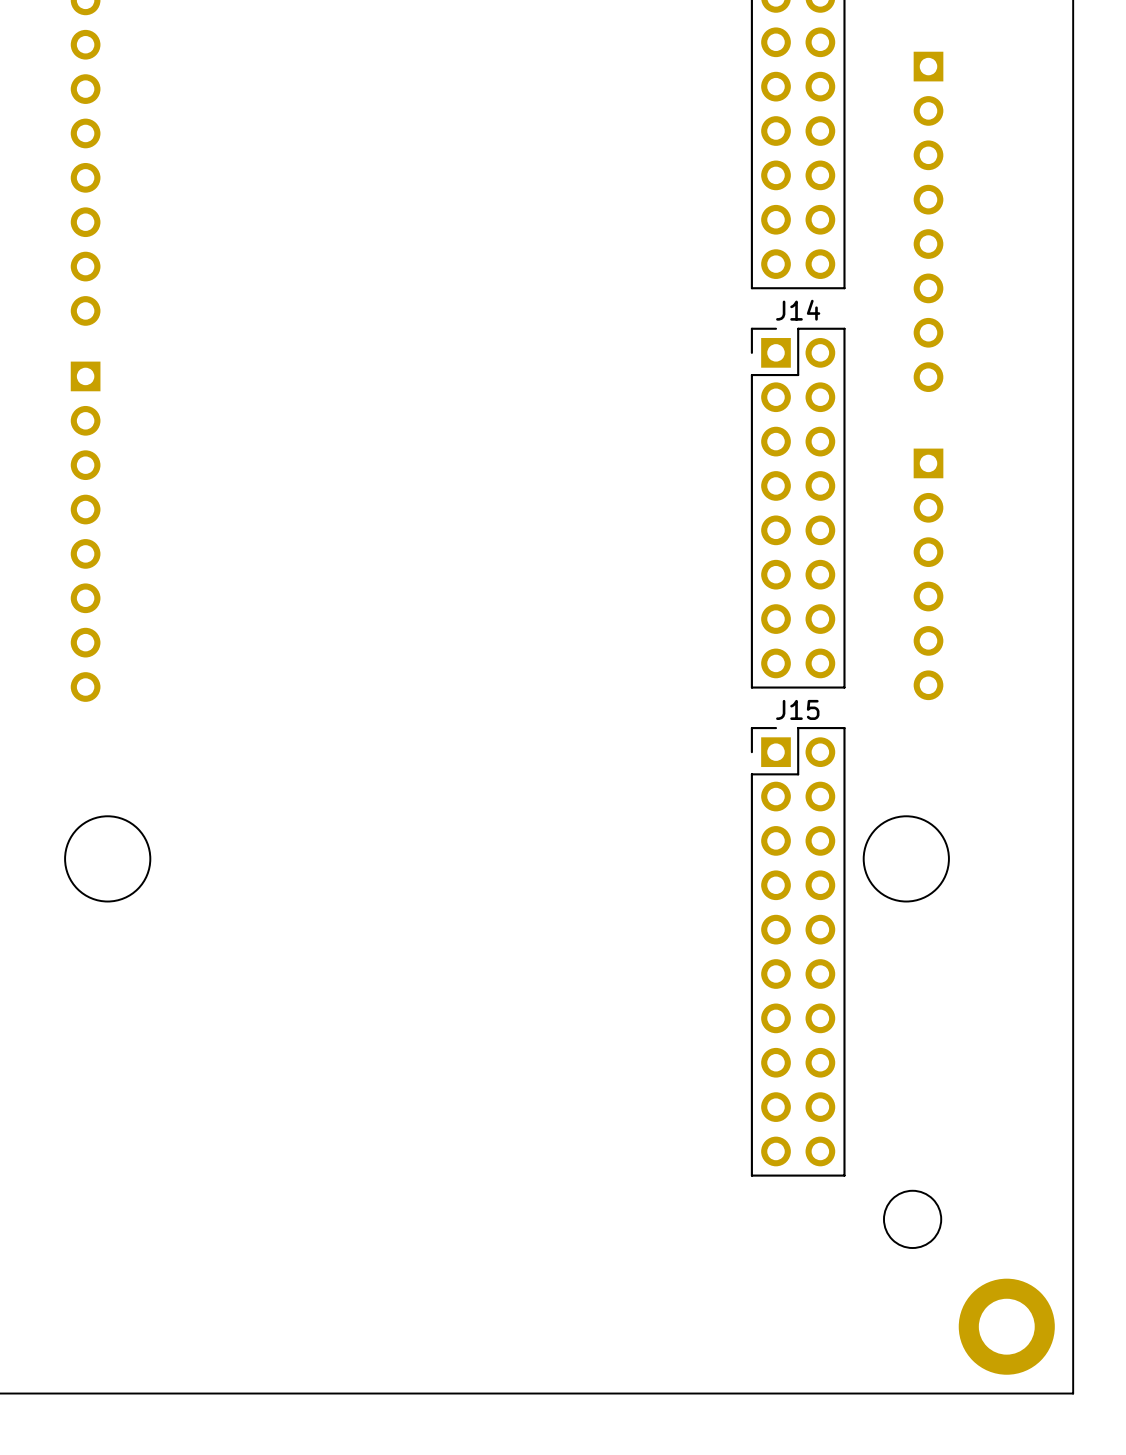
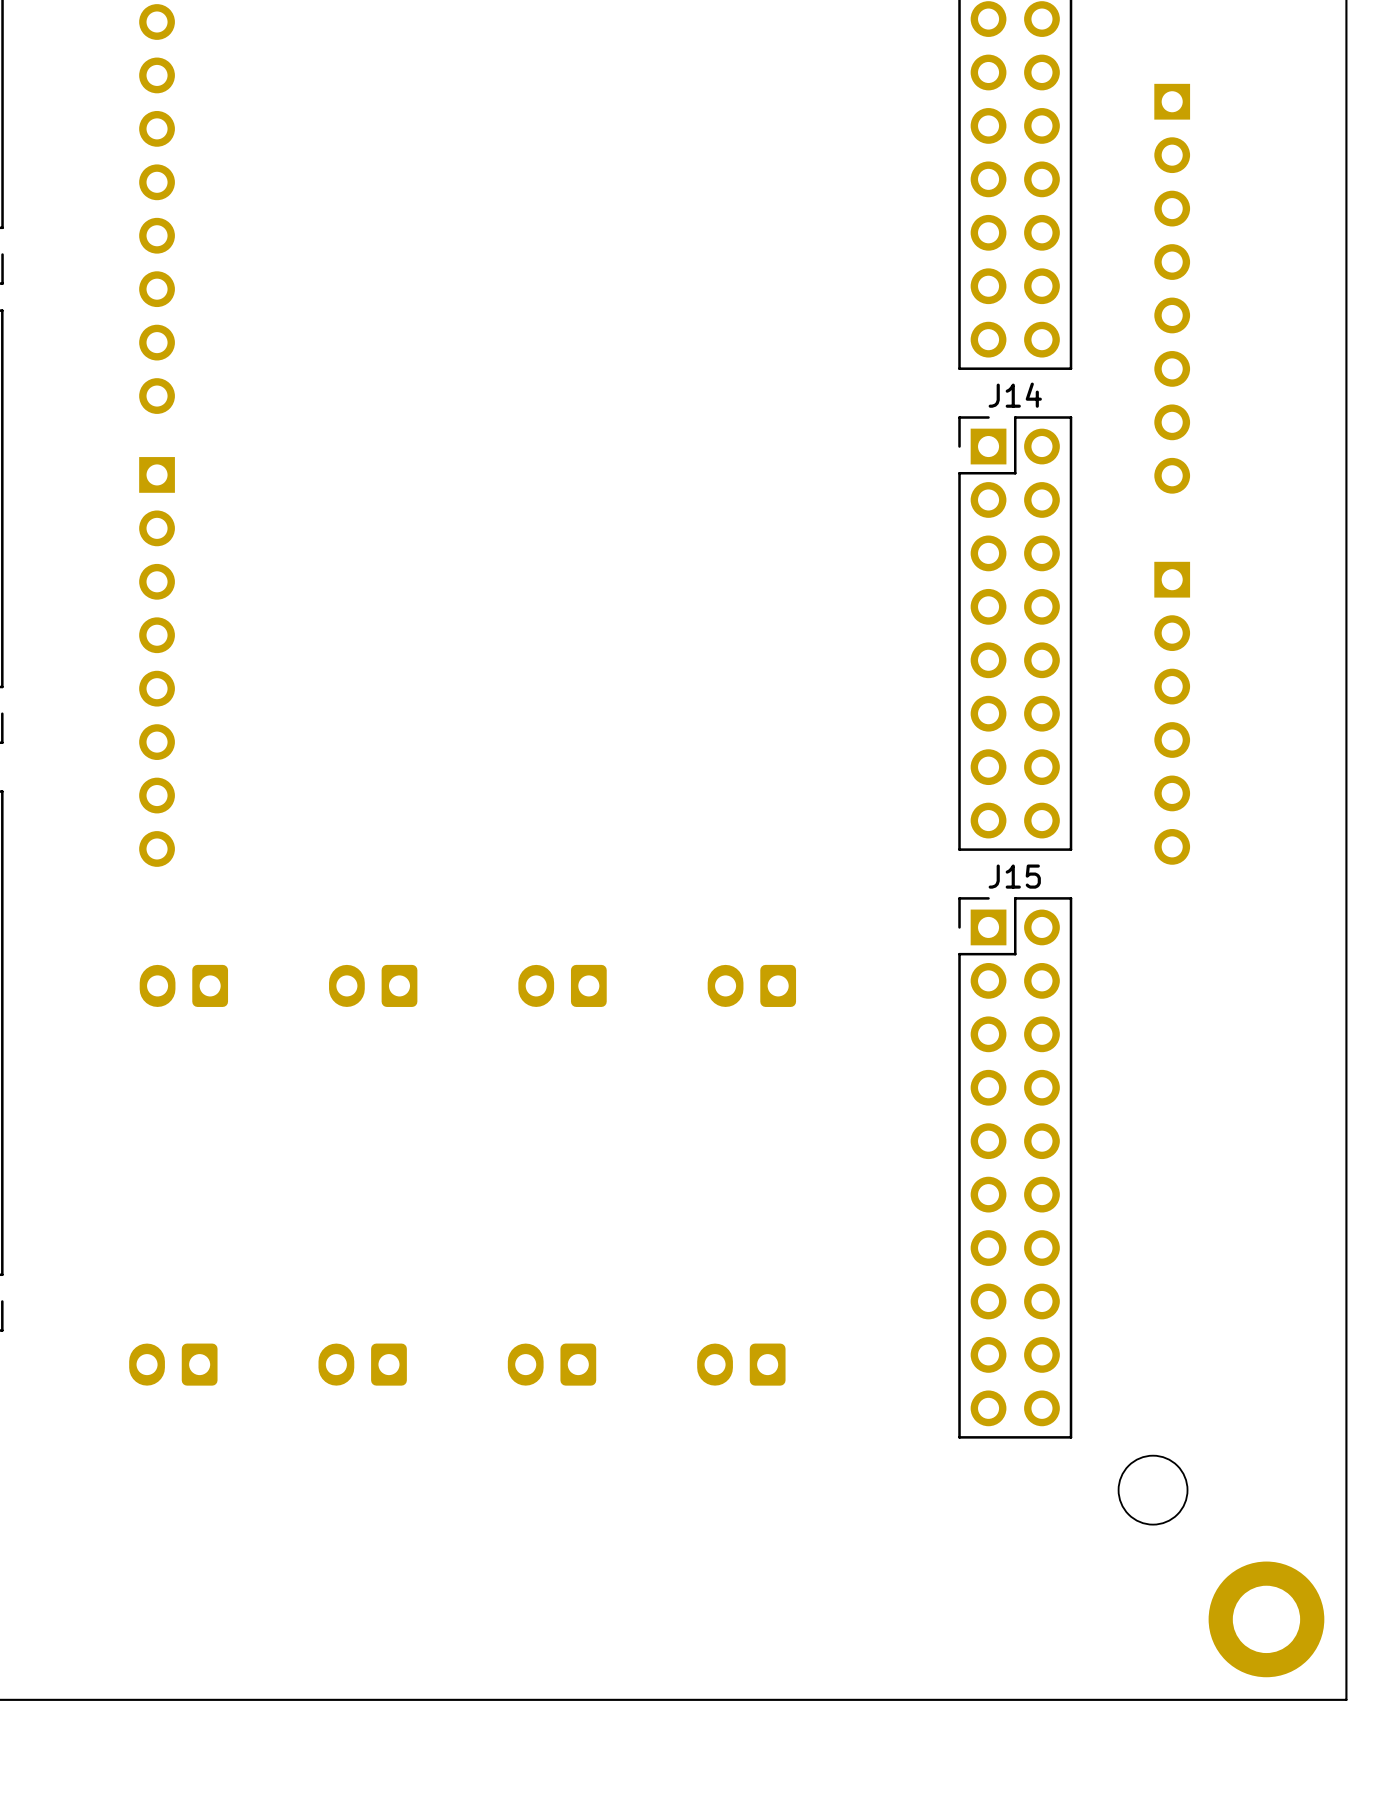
part: none -> (183, 985)
part: none -> (373, 985)
part: none -> (562, 985)
part: none -> (751, 985)
round board edge: [64, 815, 151, 902] -> none
round board edge: [863, 815, 950, 902] -> none
part: none -> (173, 1364)
part: none -> (362, 1364)
part: none -> (552, 1364)
part: none -> (741, 1364)

